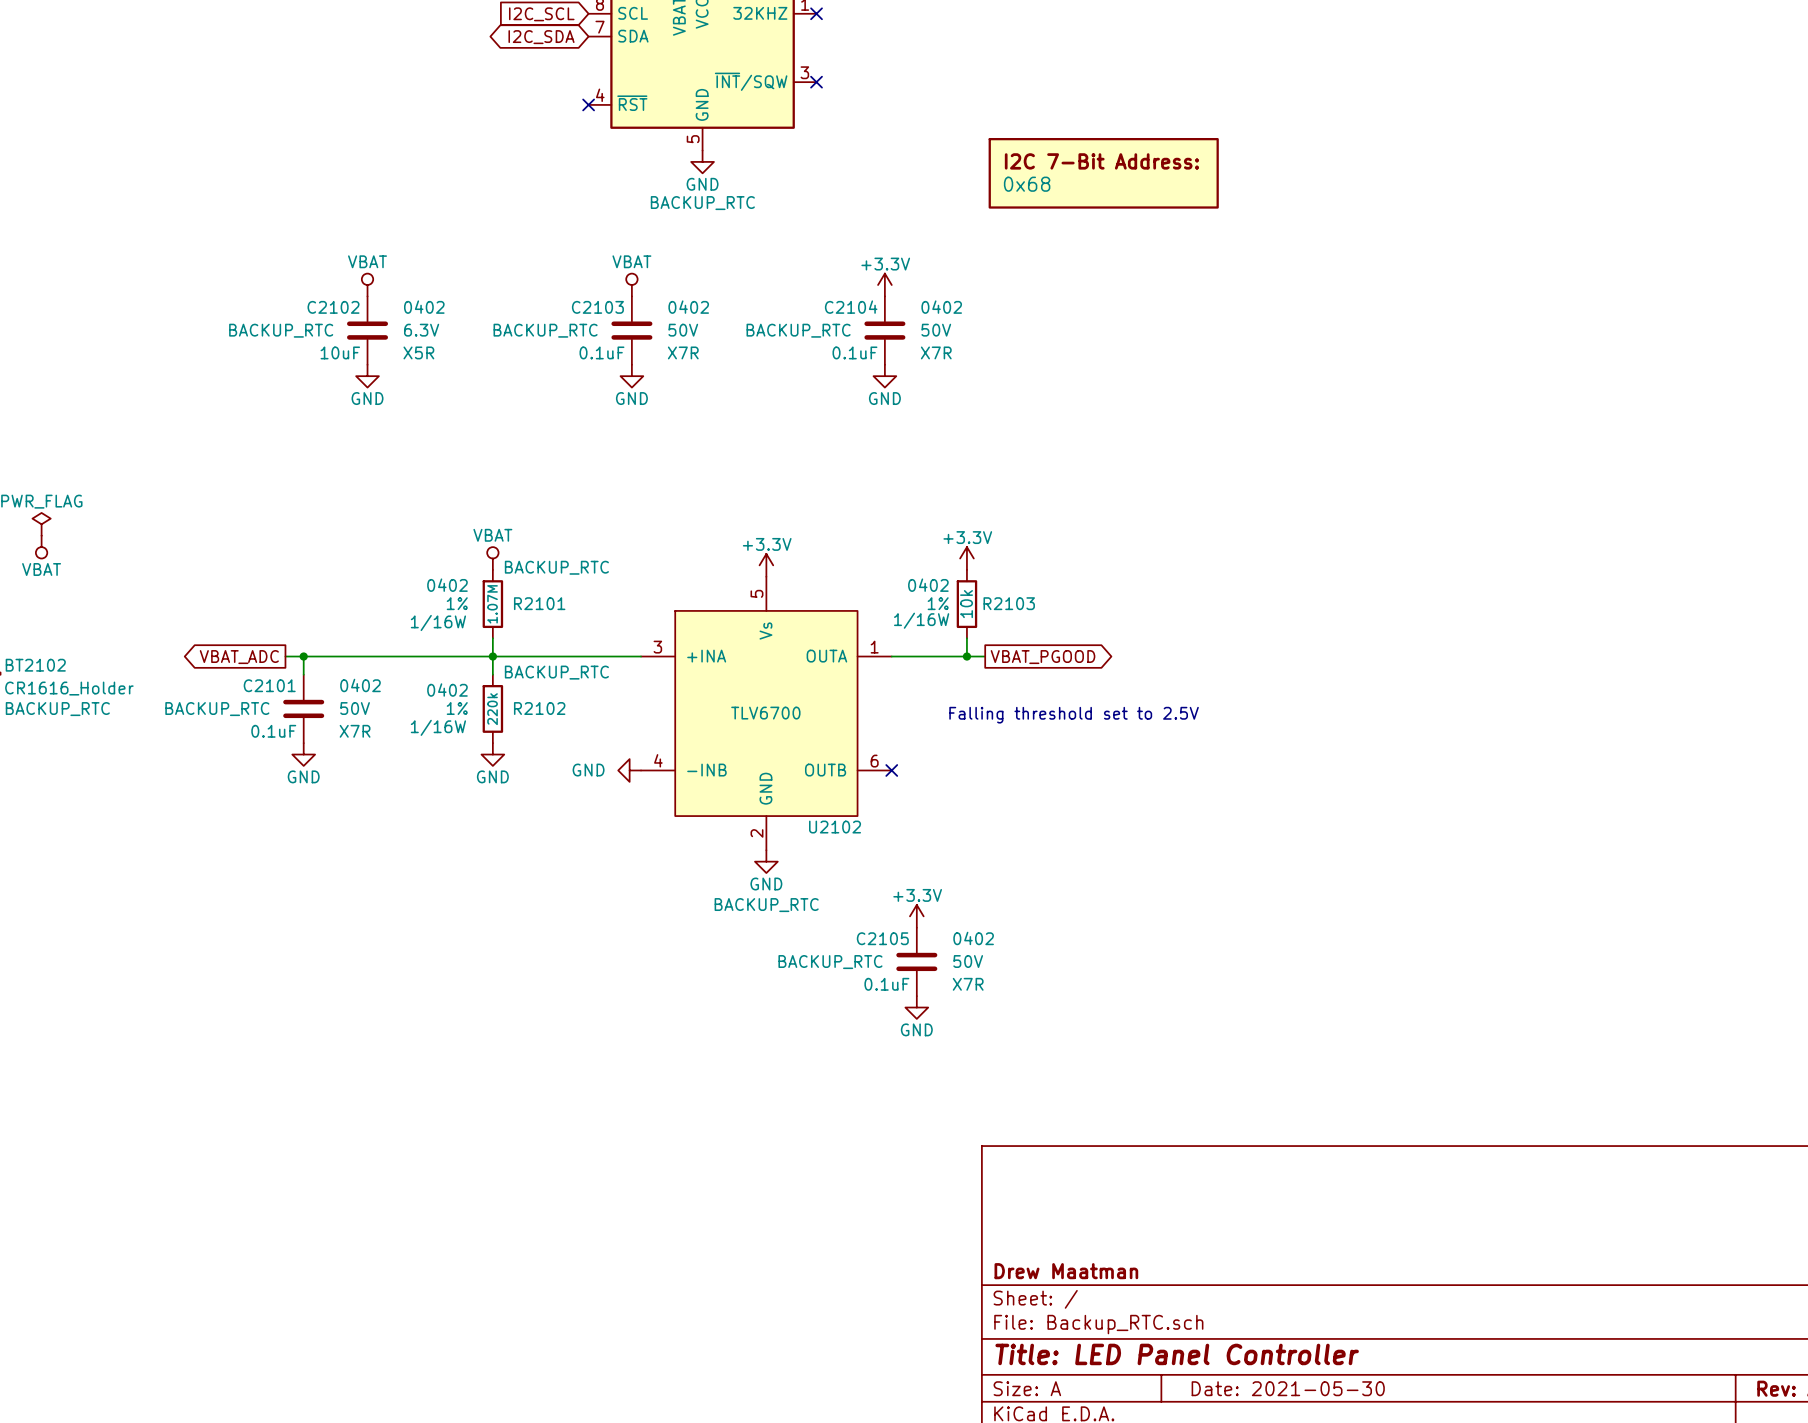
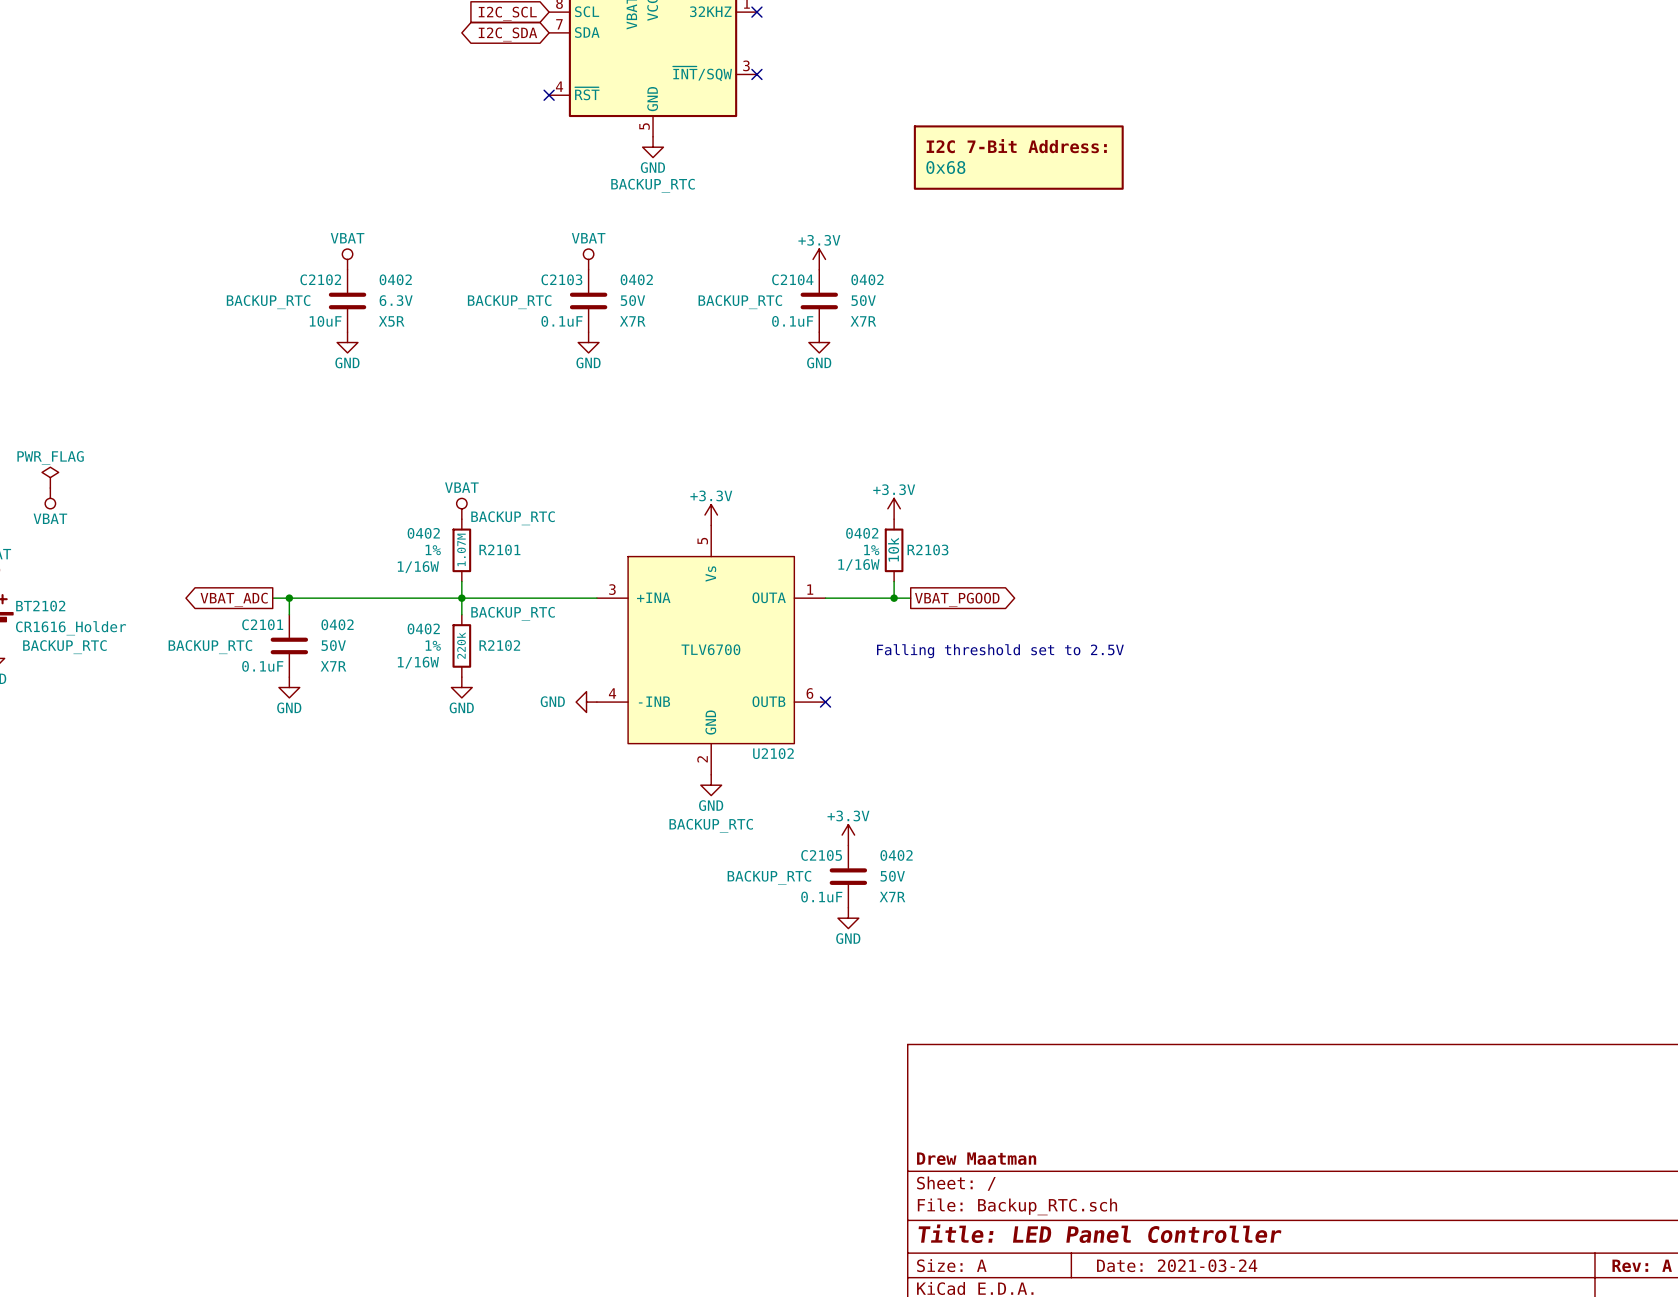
title block: Date: 2021-05-30 (1288, 1388) -> Date: 2021-03-24 (1177, 1265)

